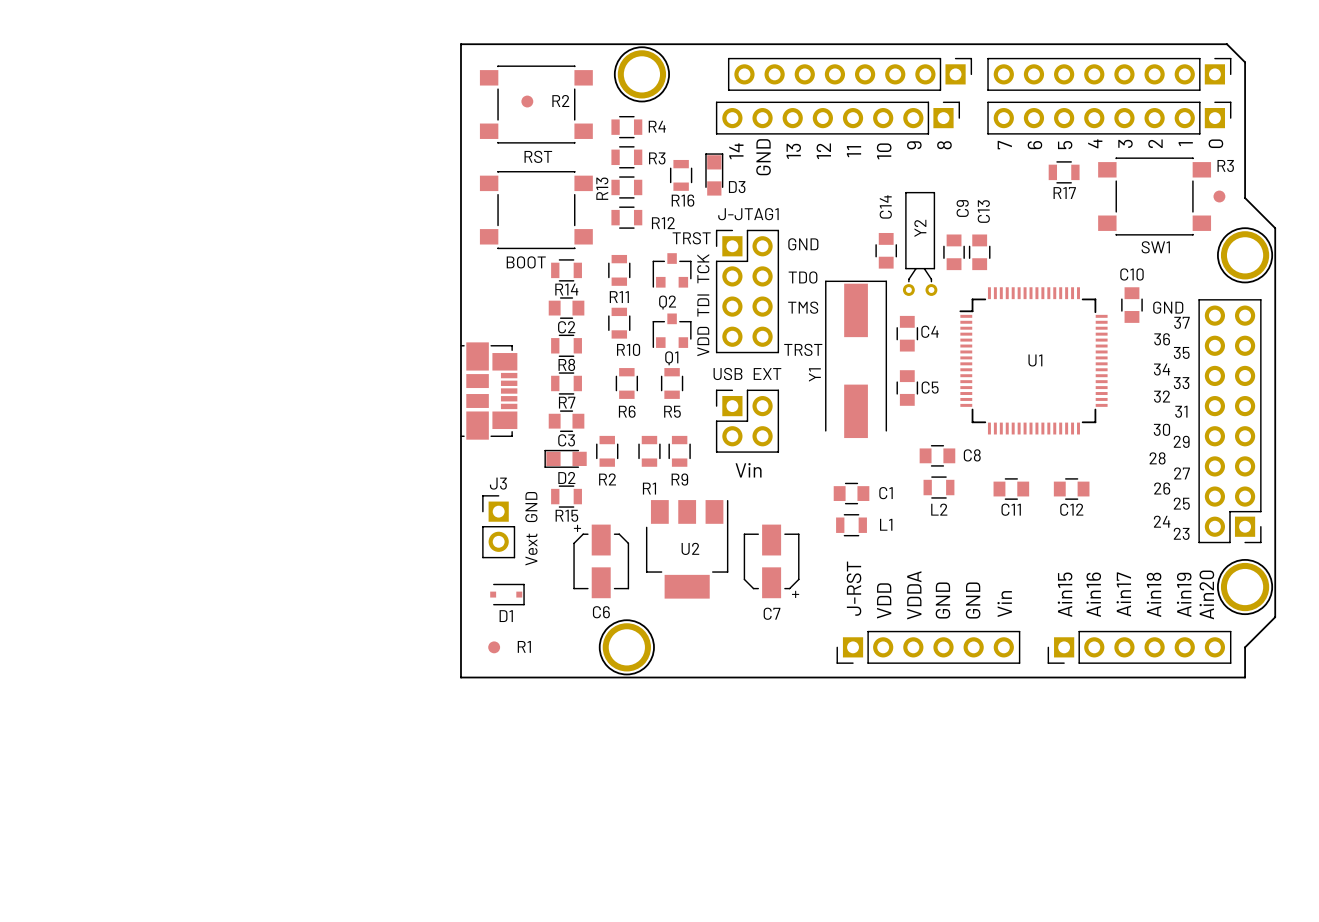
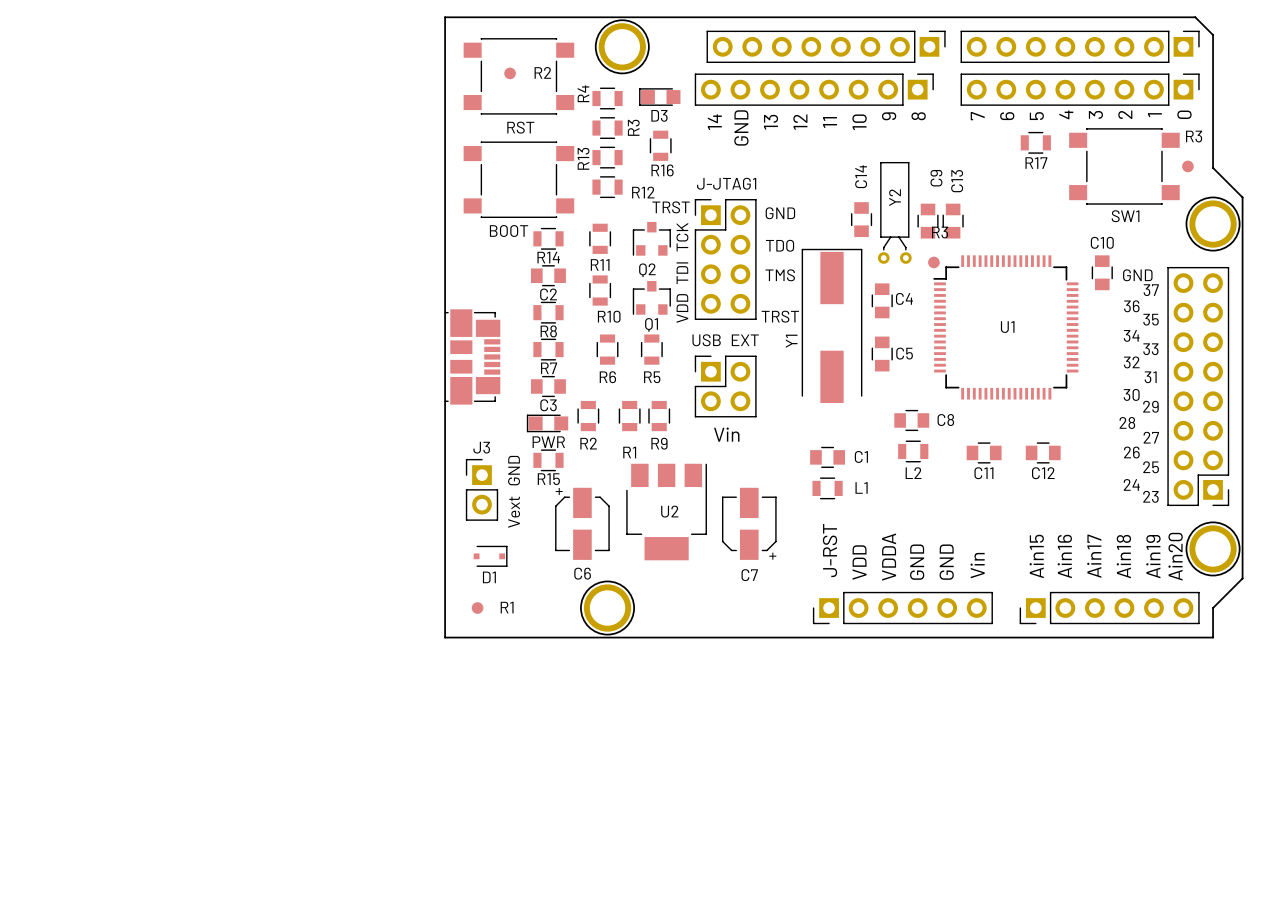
R4 name rotation: 0° (657, 126) -> 90° counterclockwise (583, 93)
R4 name position: R4 (657, 126) -> R4 (583, 93)
R3 name rotation: 0° (657, 158) -> 90° counterclockwise (633, 127)
D3 rotation: 0° (714, 174) -> 90° counterclockwise (659, 97)
D3 position: (714, 174) -> (659, 97)
D3 name position: D3 (737, 187) -> D3 (659, 115)
R3: none -> (933, 262)
D2 name: D2 (566, 477) -> PWR (548, 442)

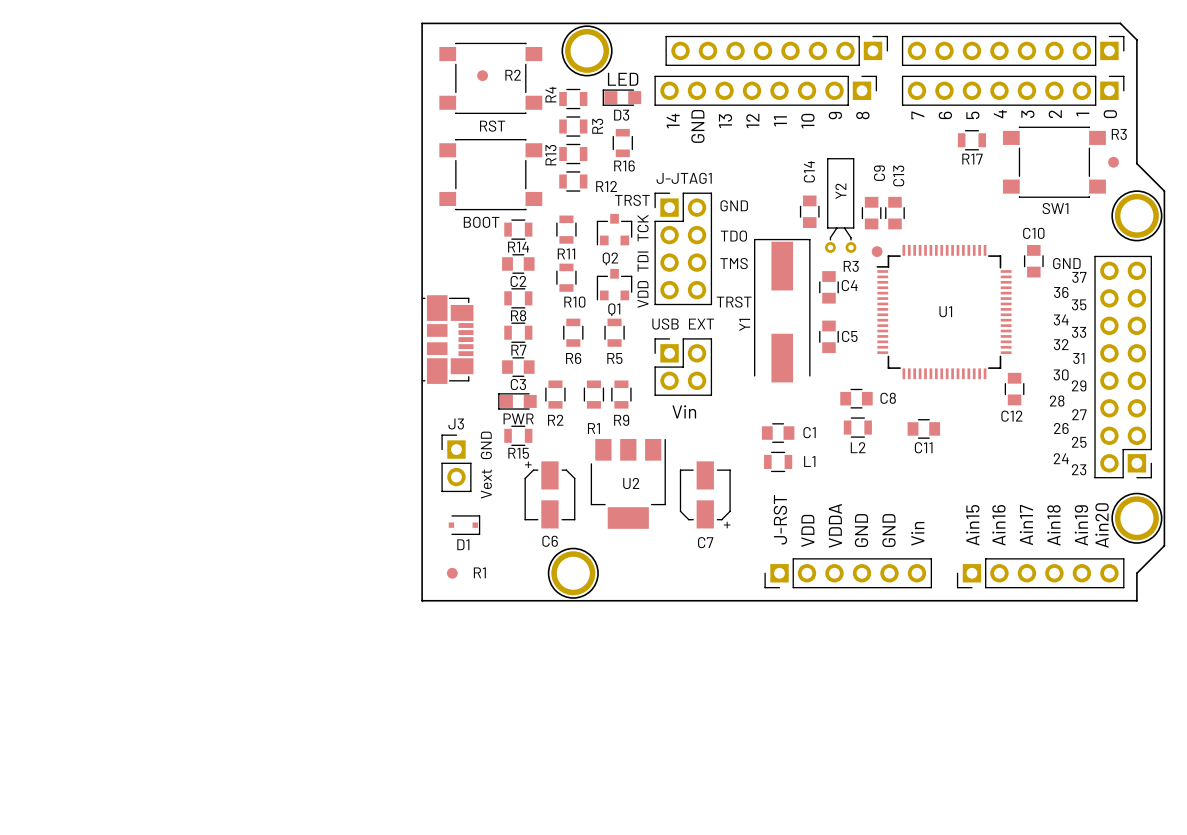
text: none -> LED (623, 79)
R3 name position: R3 (940, 232) -> R3 (851, 266)
C12 rotation: 0° (1043, 452) -> 90° clockwise (1014, 389)
C12 position: (1043, 452) -> (1014, 389)

